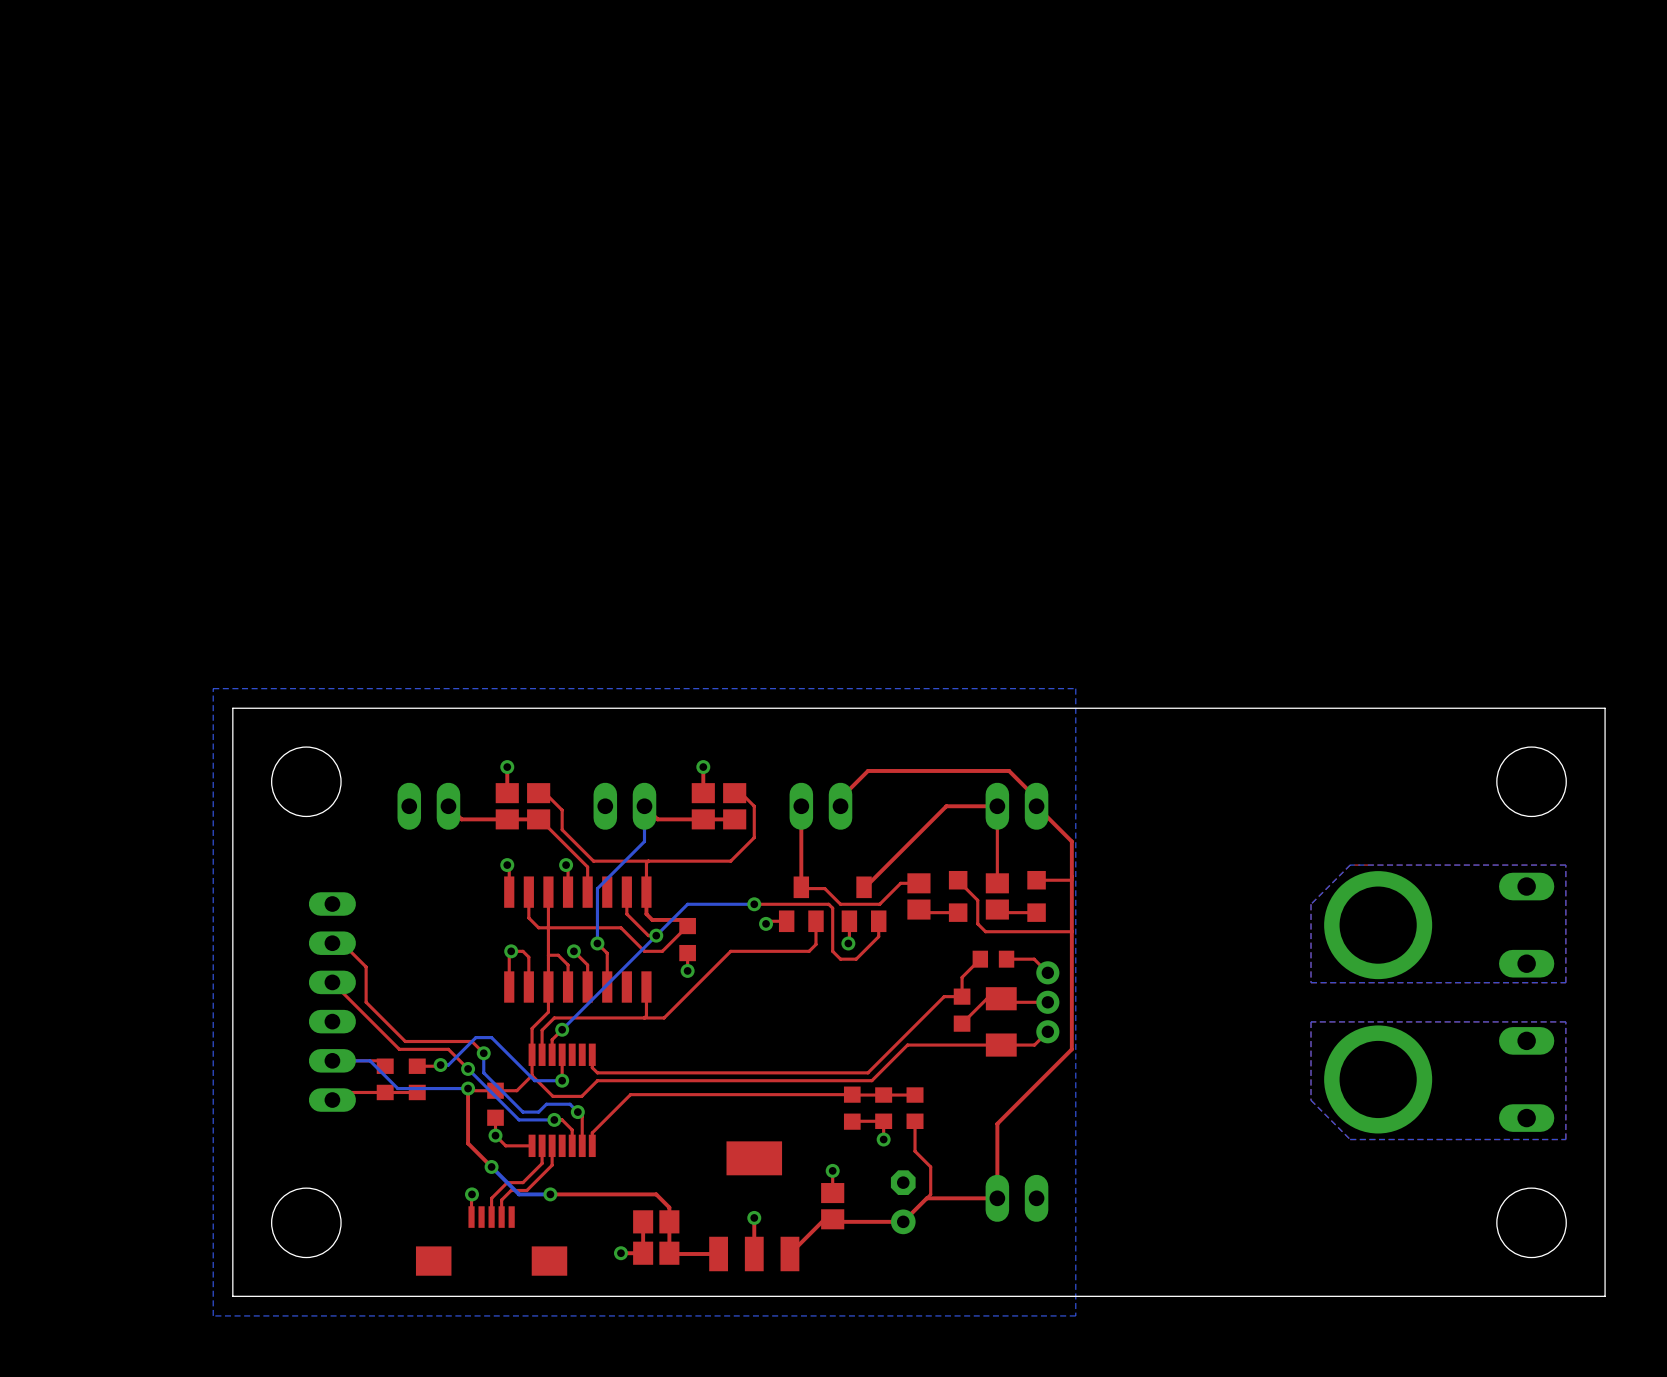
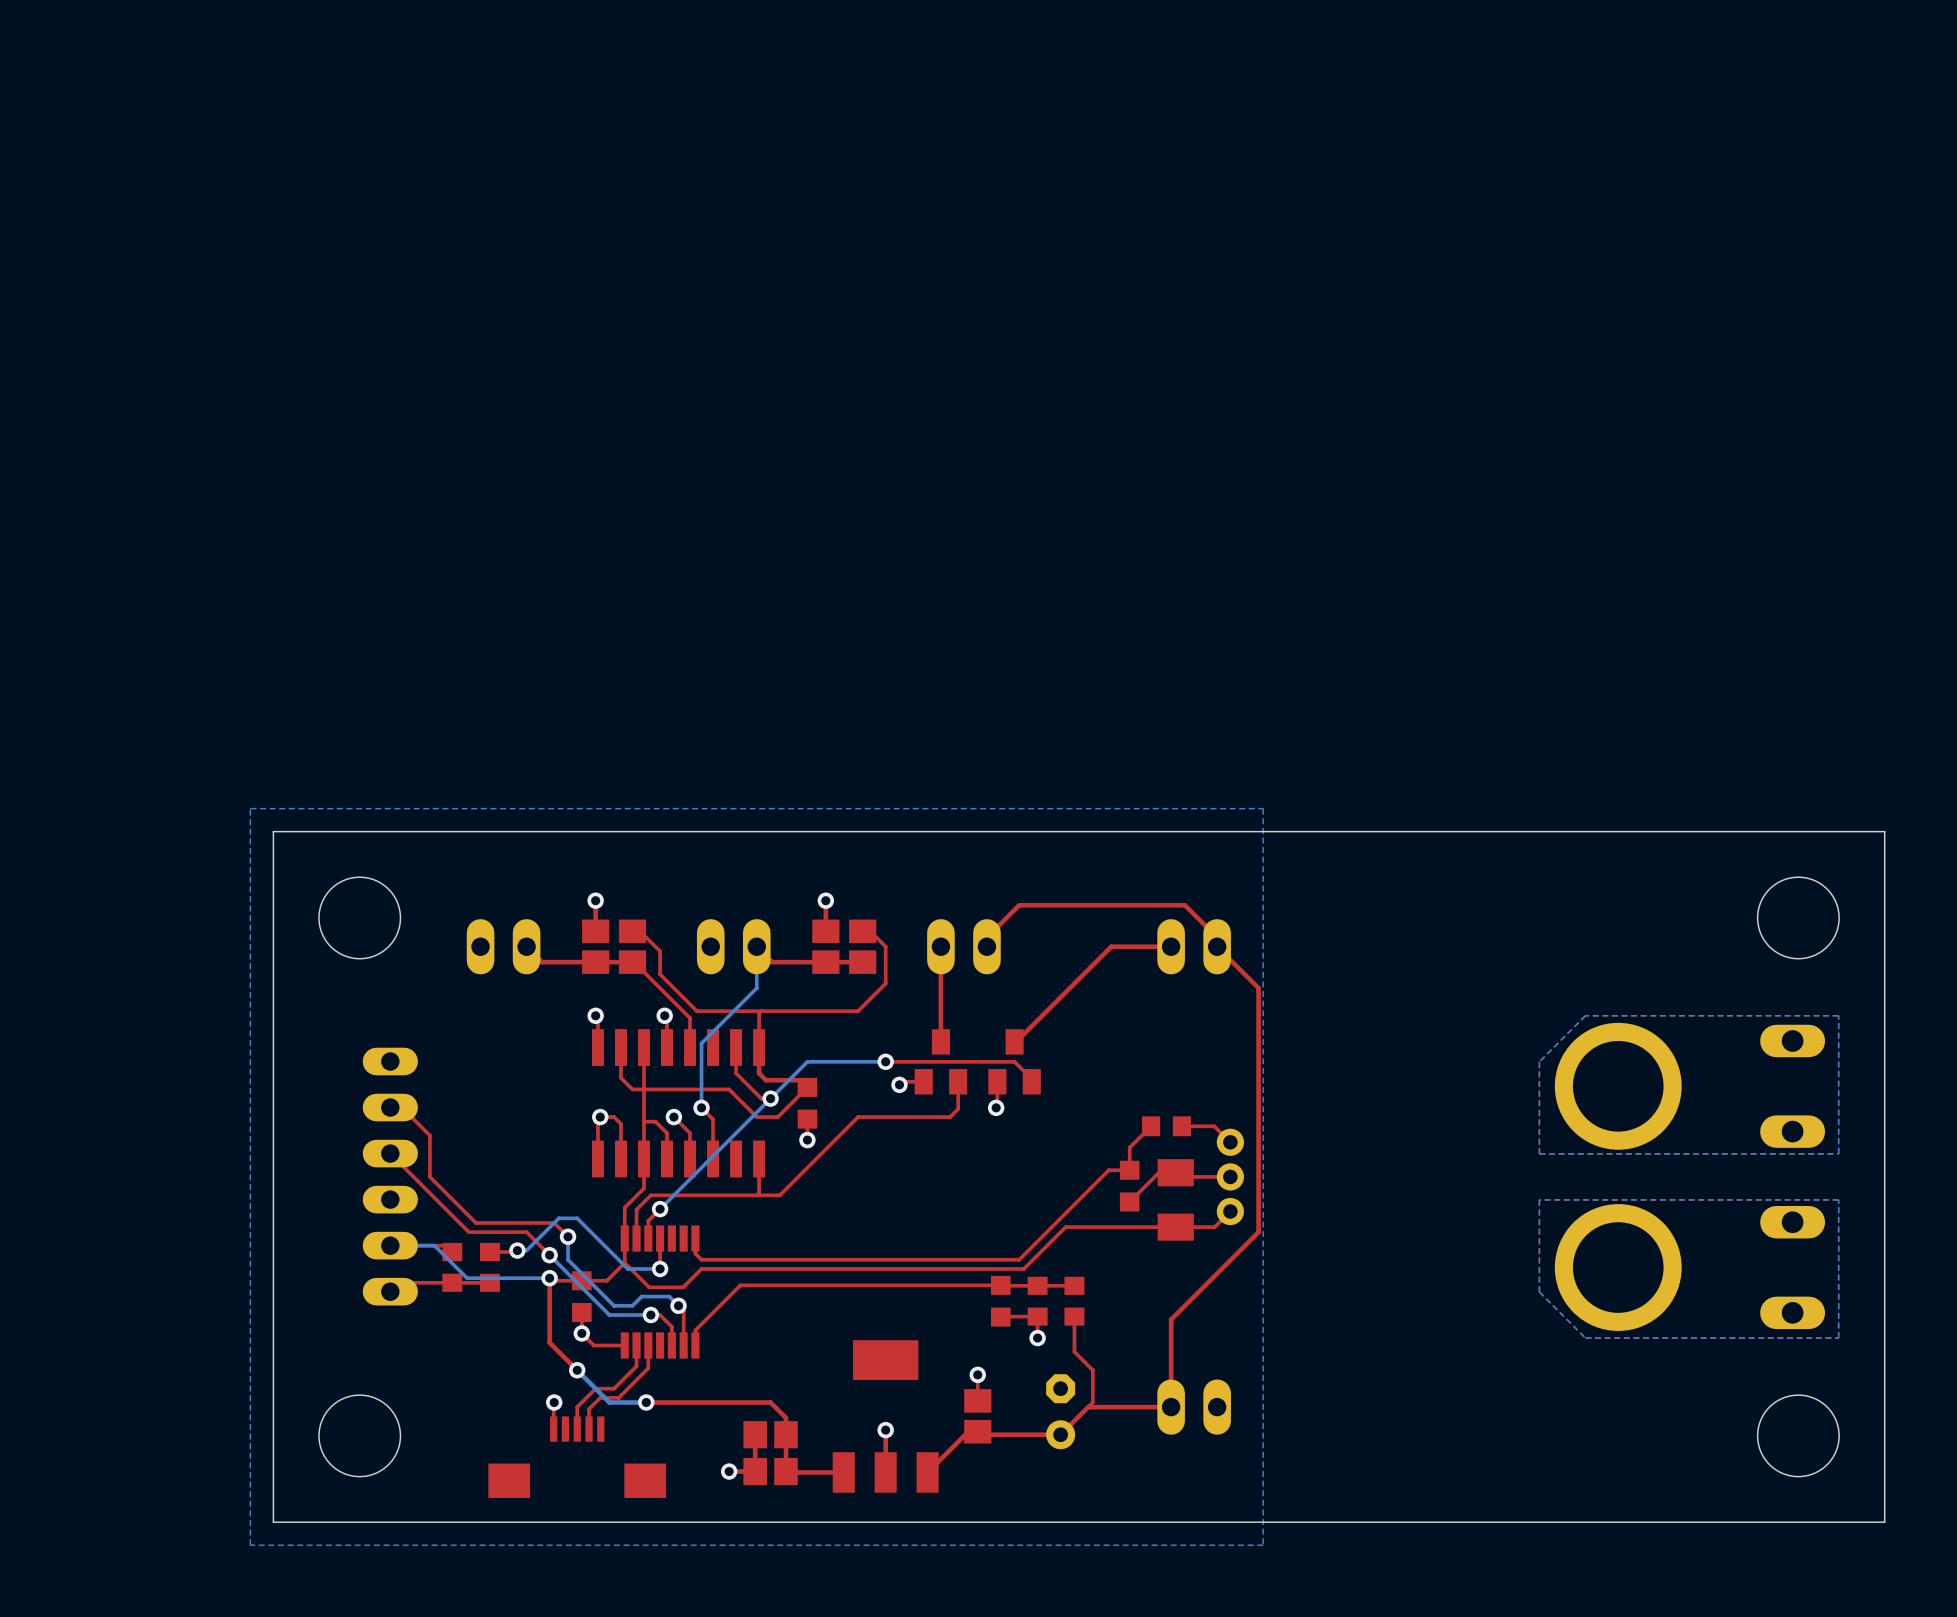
top track: (997, 806) (997, 883) -> none
top track: (1071, 876) (1071, 880) (1036, 880) -> none
top track: (958, 880) (977, 900) (977, 923) (985, 931) (1071, 931) -> none
top track: (918, 883) (900, 883) (879, 904) (864, 904) -> (1031, 1079) (1014, 1061)
top track: (801, 887) (824, 888) (840, 904) -> (973, 1061) (986, 1061)
part: (918, 896) -> none
part: (958, 896) -> none
part: (997, 896) -> none
part: (1036, 896) -> none
top track: (828, 904) (832, 908) (832, 951) (840, 959) (856, 959) (878, 936) (878, 921) -> none
top track: (918, 909) (922, 912) (958, 912) -> none
top track: (997, 909) (997, 912) (1036, 912) -> none

